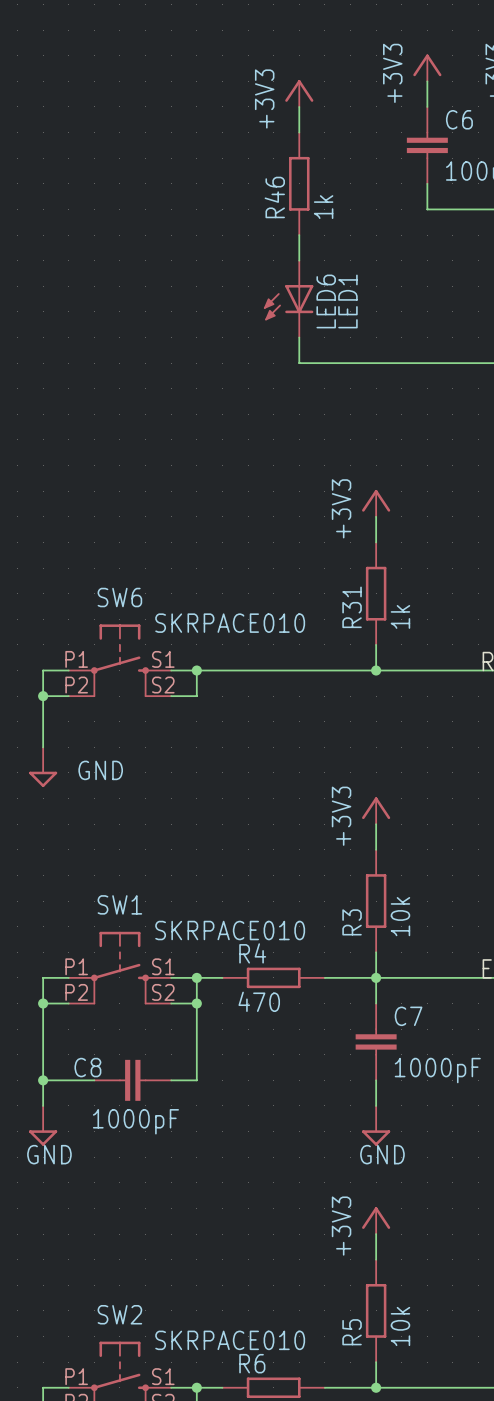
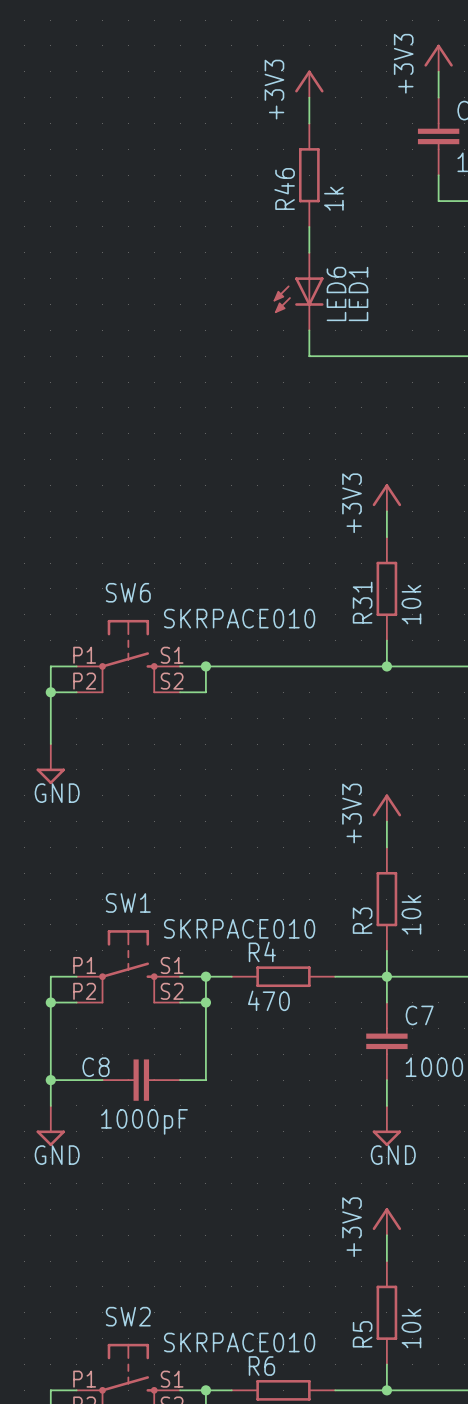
R31 value: 1k (400, 616) -> 10k (411, 604)
power symbol text position: GND (100, 770) -> GND (57, 793)

